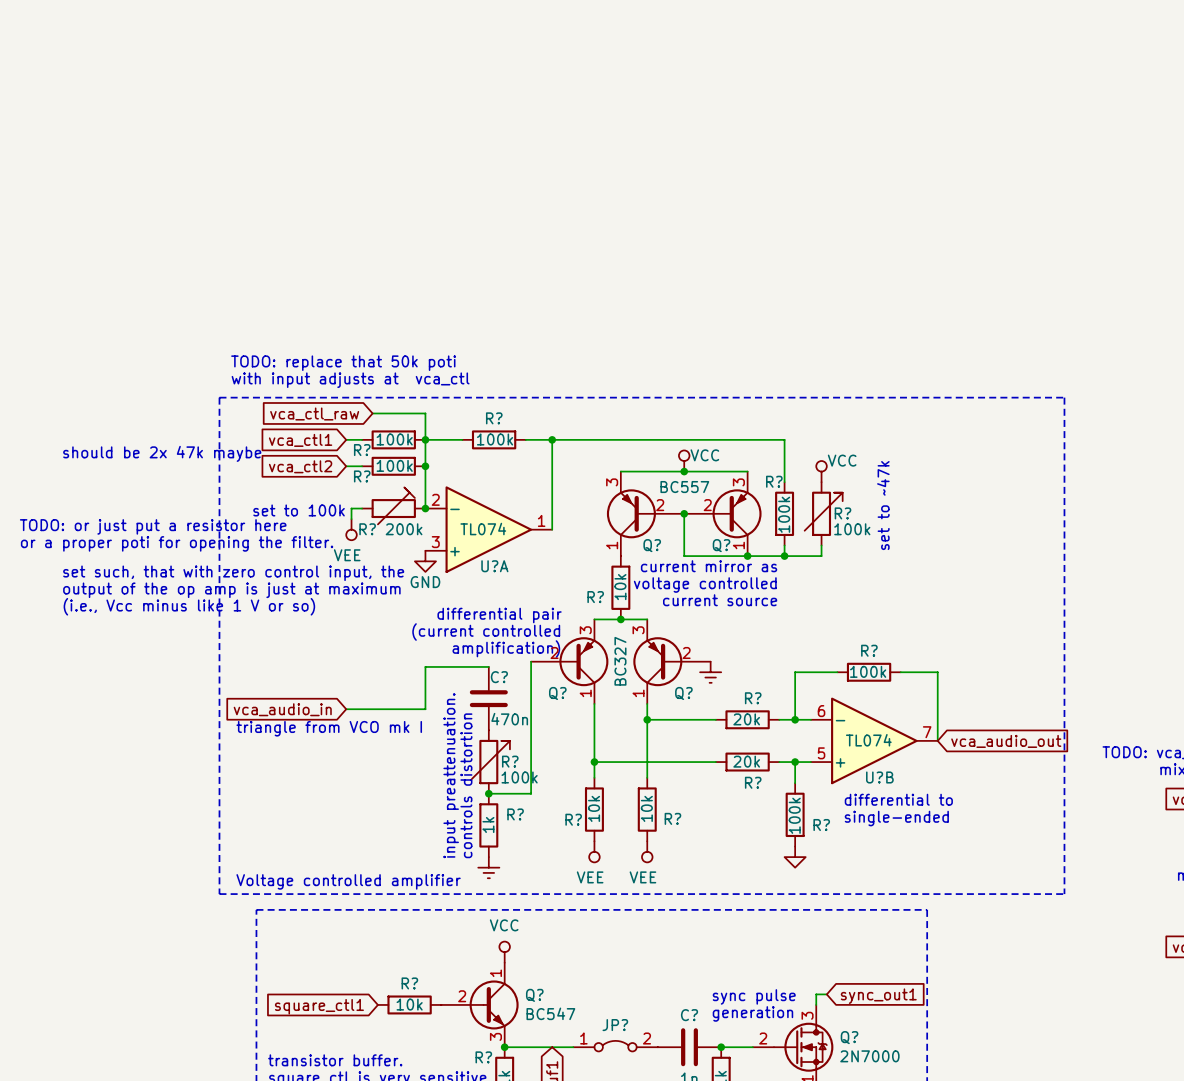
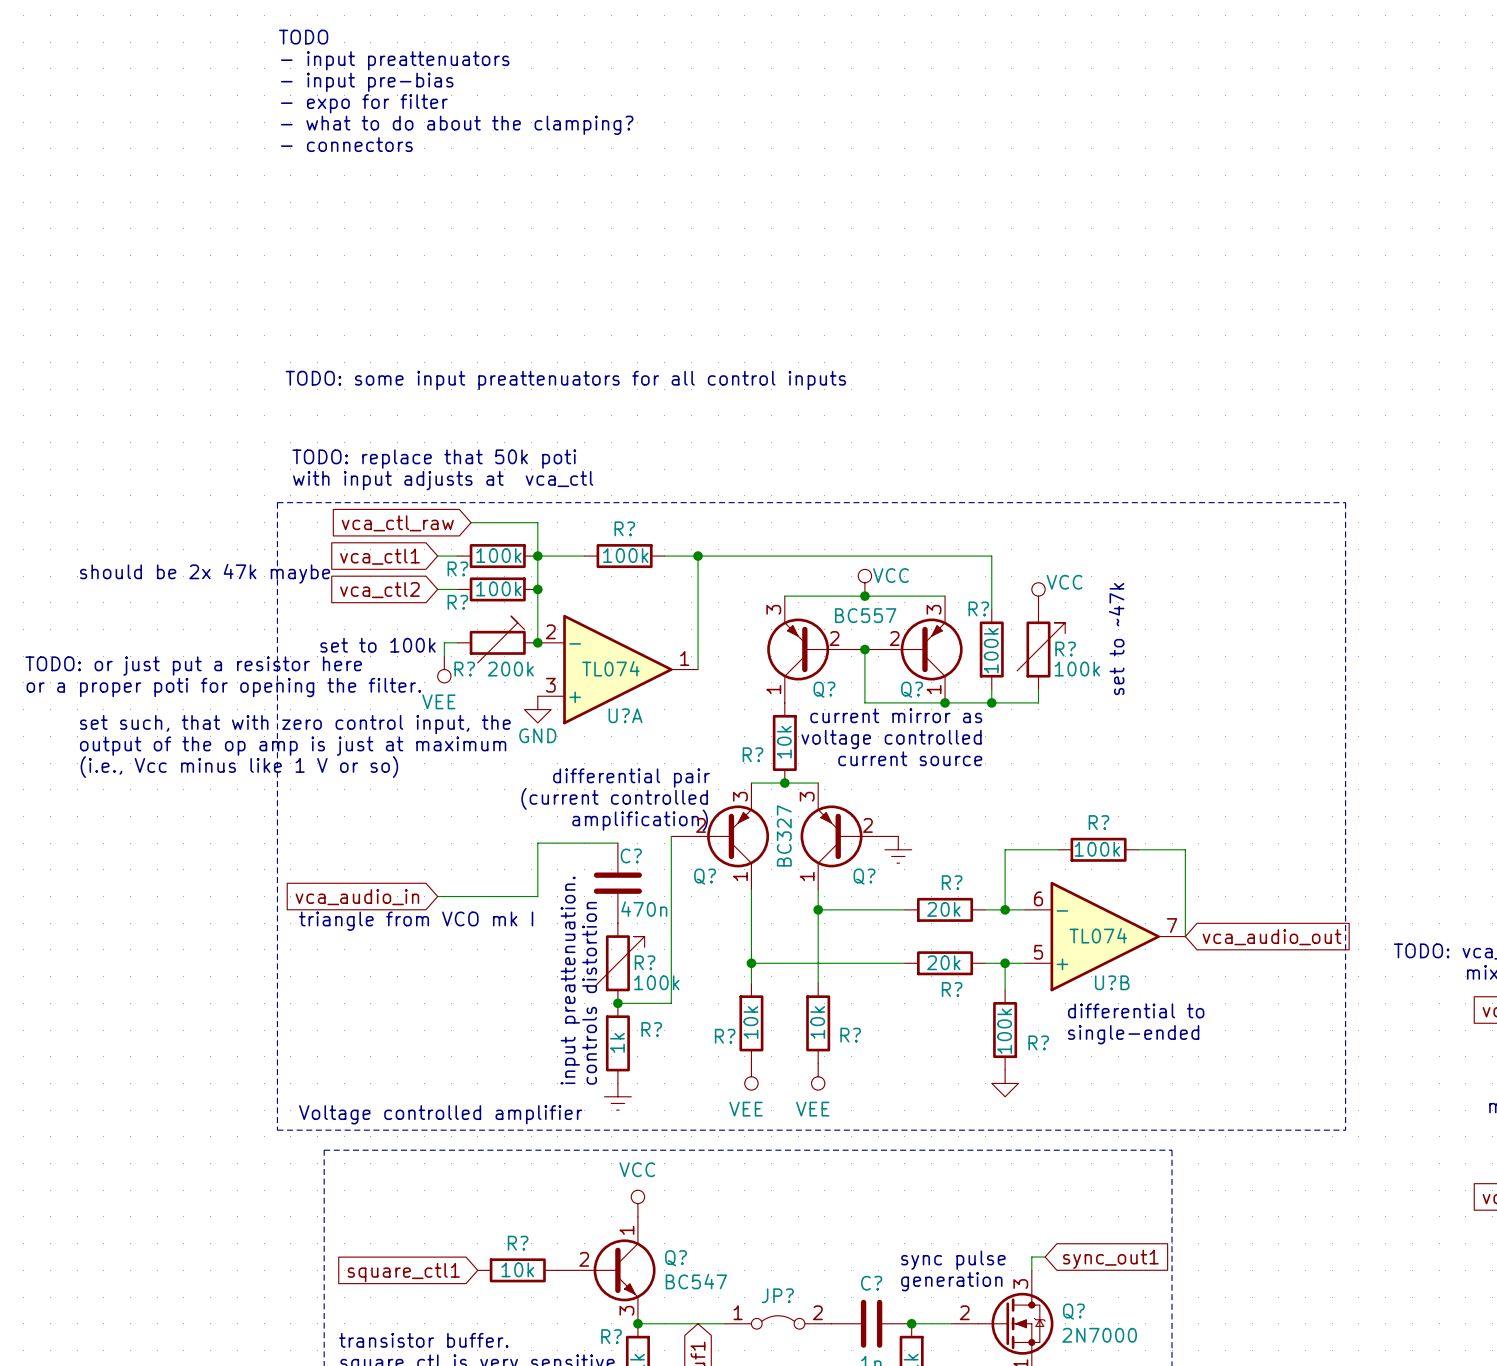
text: none -> TODO (303, 37)
text: none -> - input preattenuators (395, 60)
text: none -> - input pre-bias (367, 82)
text: none -> - expo for filter (364, 103)
text: none -> - what to do about the clamping? (457, 125)
text: none -> - connectors (346, 144)
text: none -> TODO: some input preattenuators for all control inputs (565, 380)

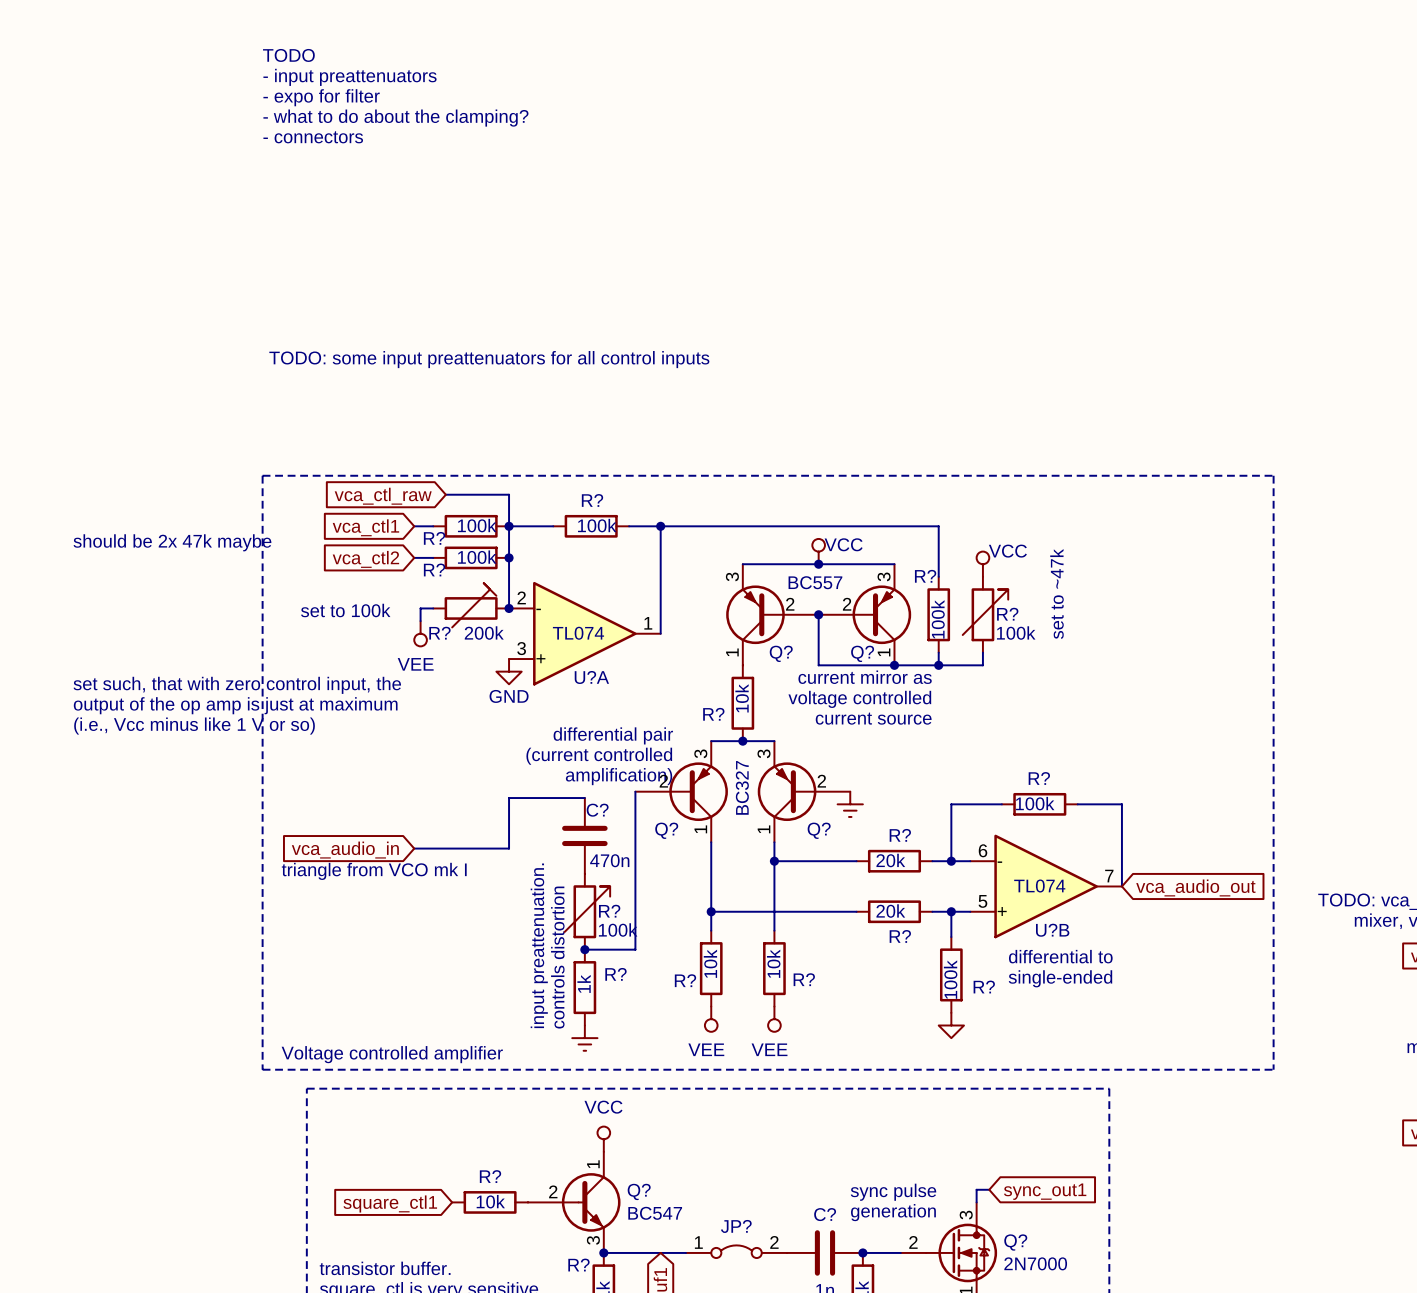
text: TODO (303, 37) -> none
text: - input preattenuators (395, 60) -> TODO (288, 55)
text: - input pre-bias (367, 82) -> - input preattenuators (349, 77)
text: TODO: replace that 50k poti (434, 459) -> none
text: with input adjusts at vca_ctl (443, 480) -> none
text: TODO: or just put a resistor here (193, 666) -> none
text: or a proper poti for opening the filter. (223, 687) -> none

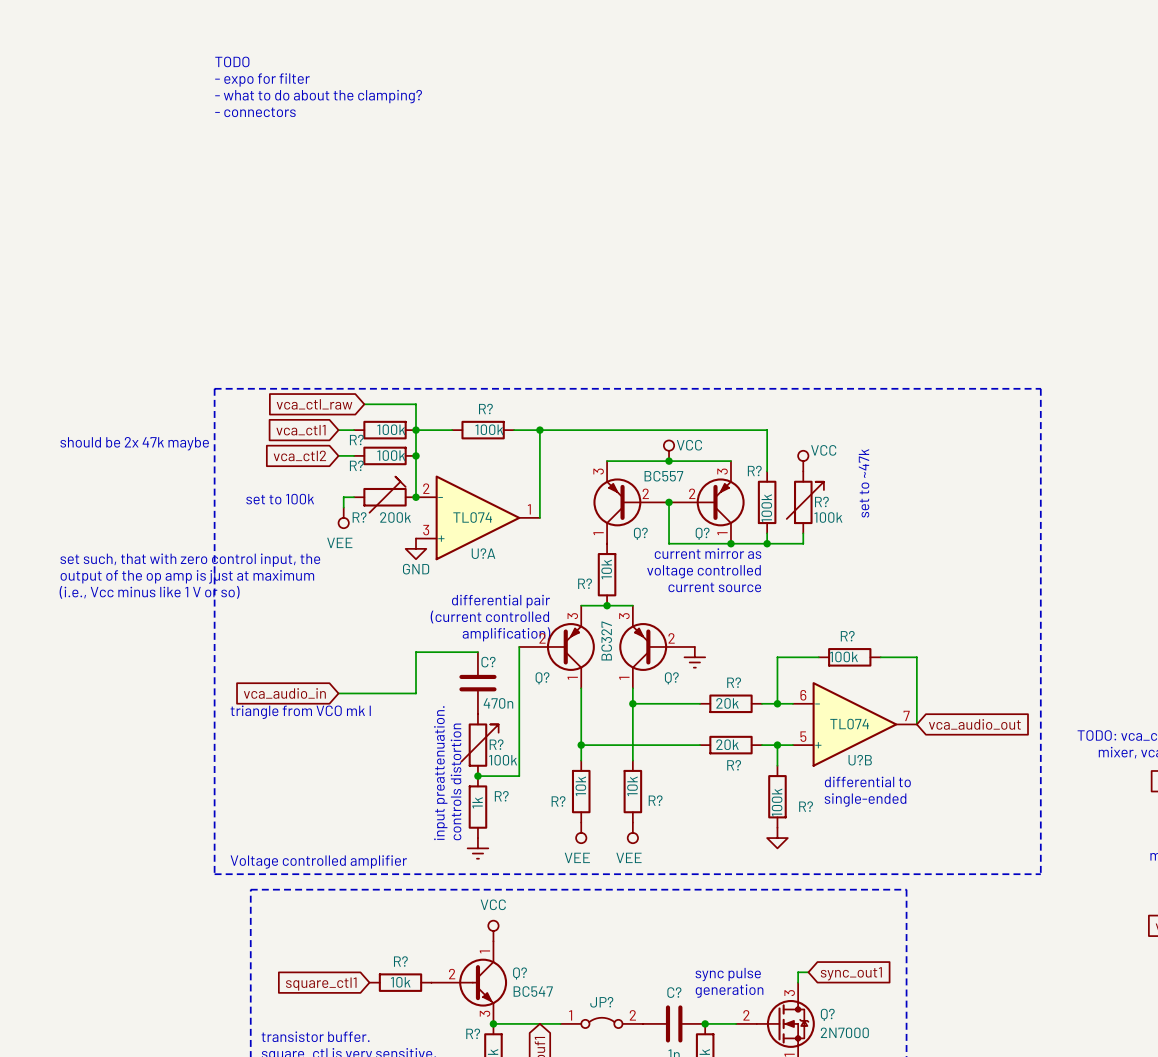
text: TODO (288, 55) -> none
text: - input preattenuators (349, 77) -> TODO (232, 61)
text: TODO: some input preattenuators for all control inputs (489, 359) -> none

